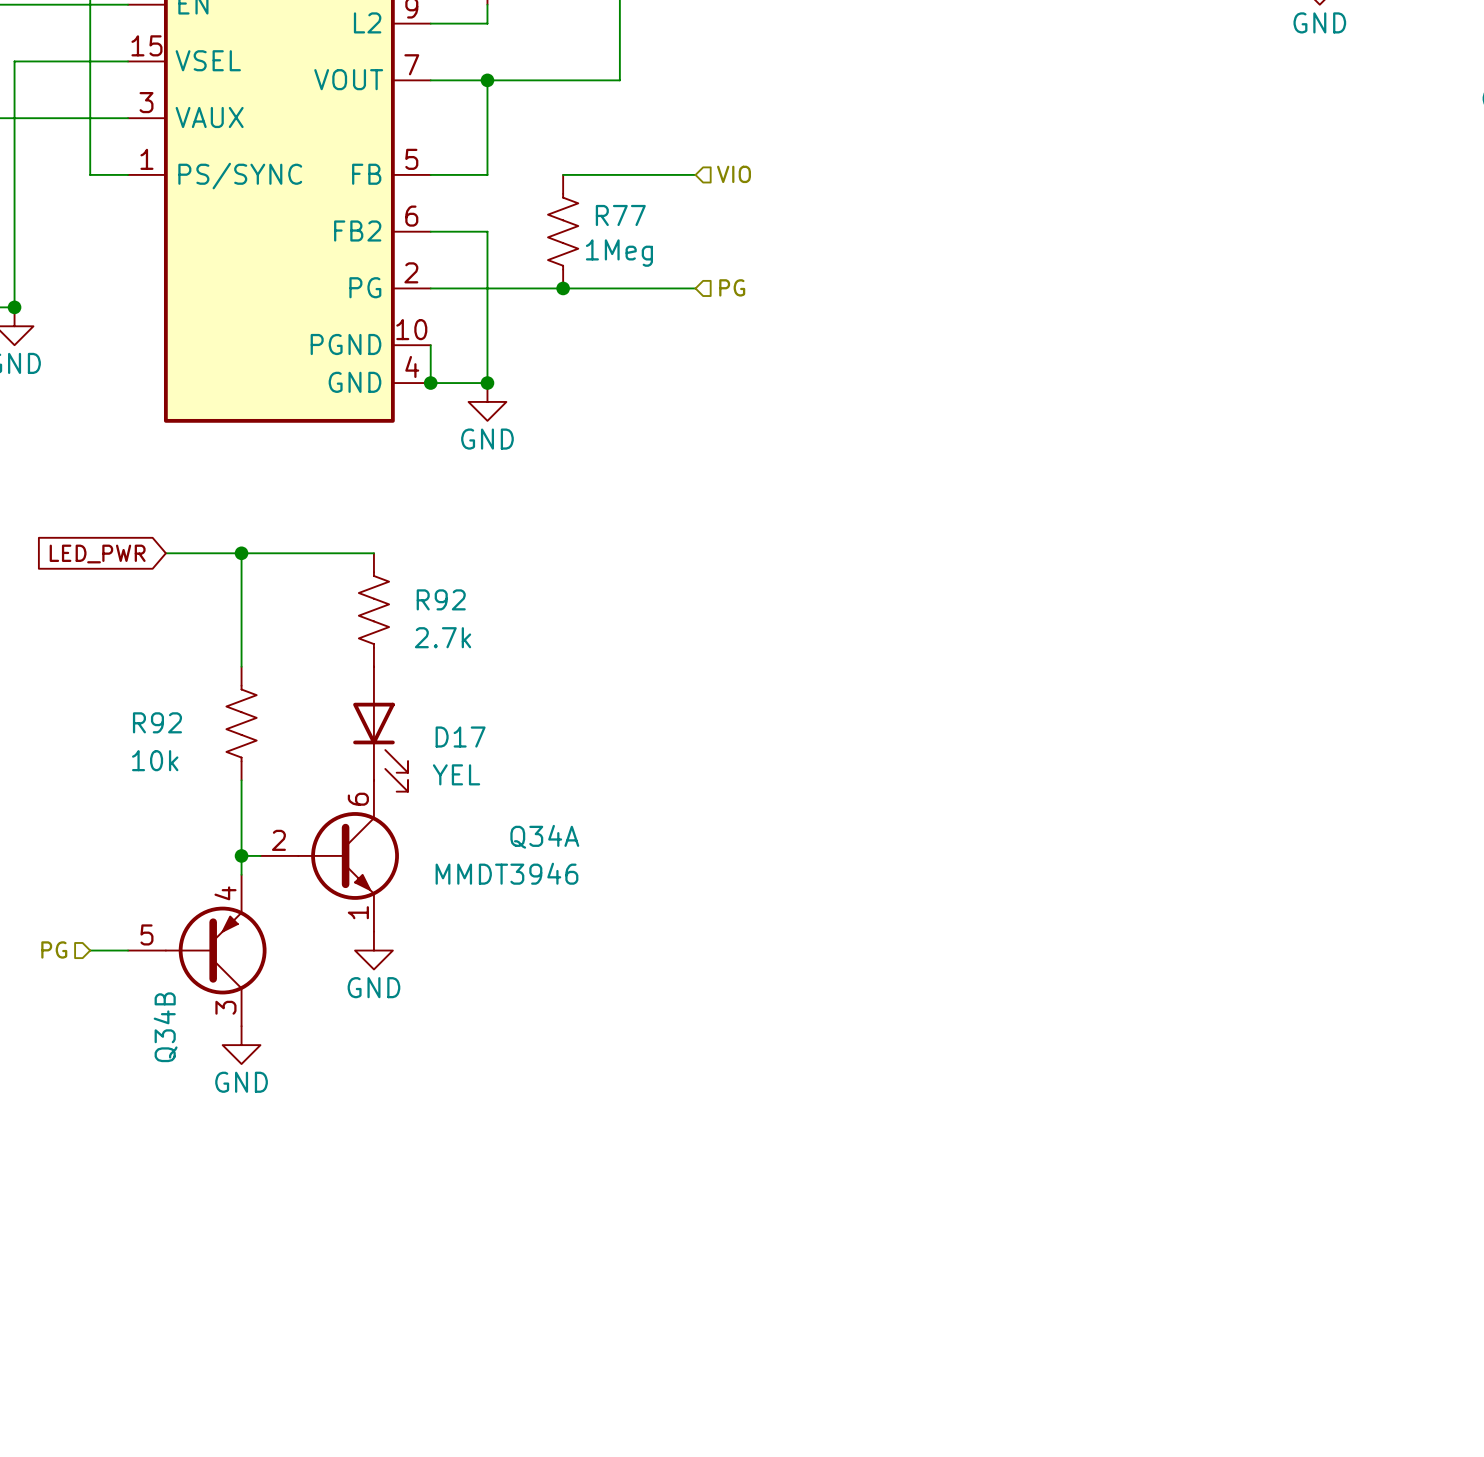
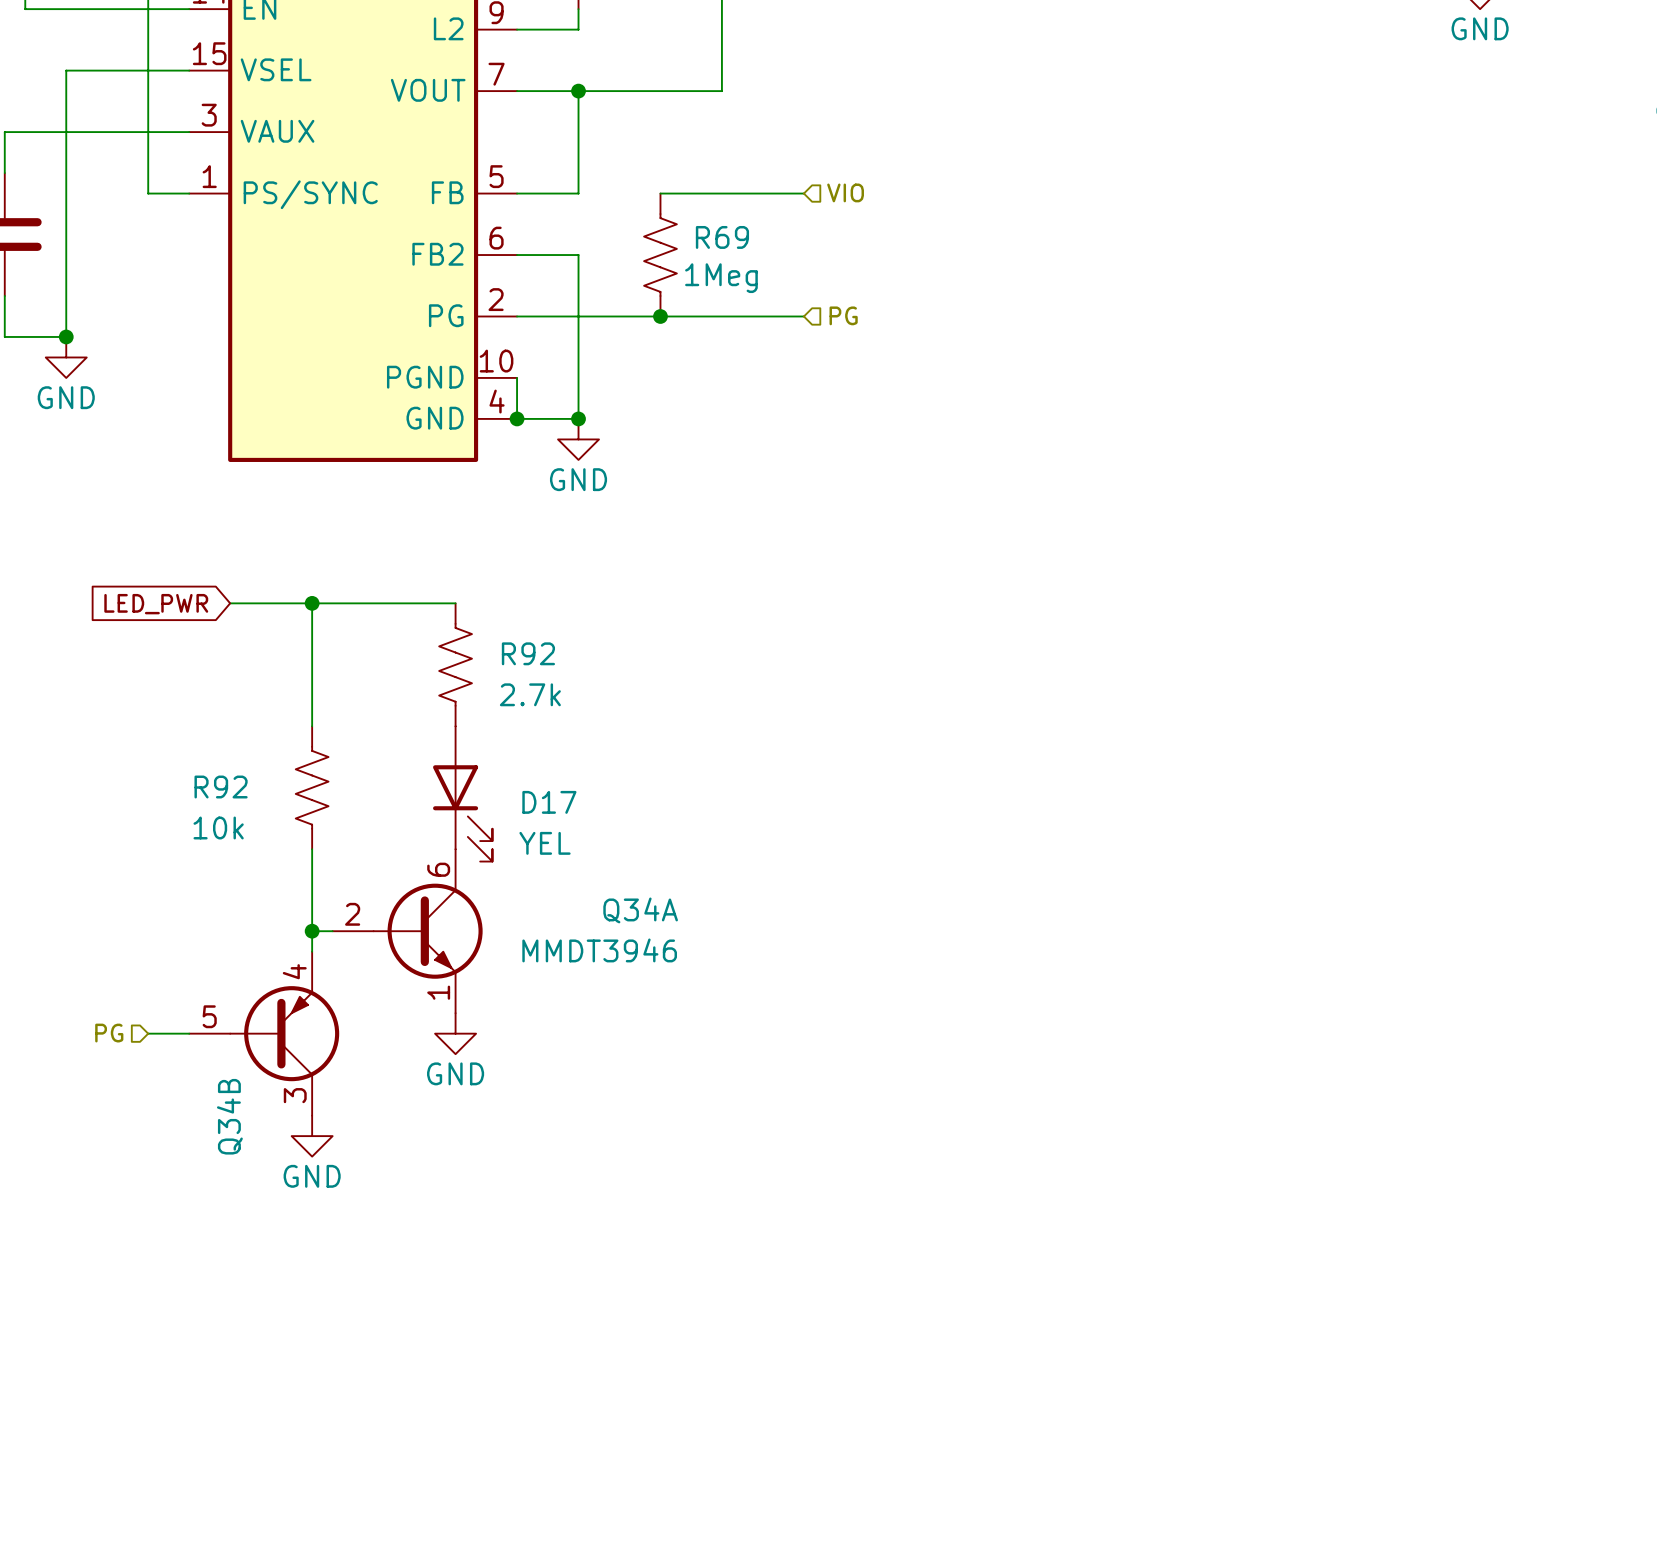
R77 name: R77 (620, 215) -> R69 (722, 237)

